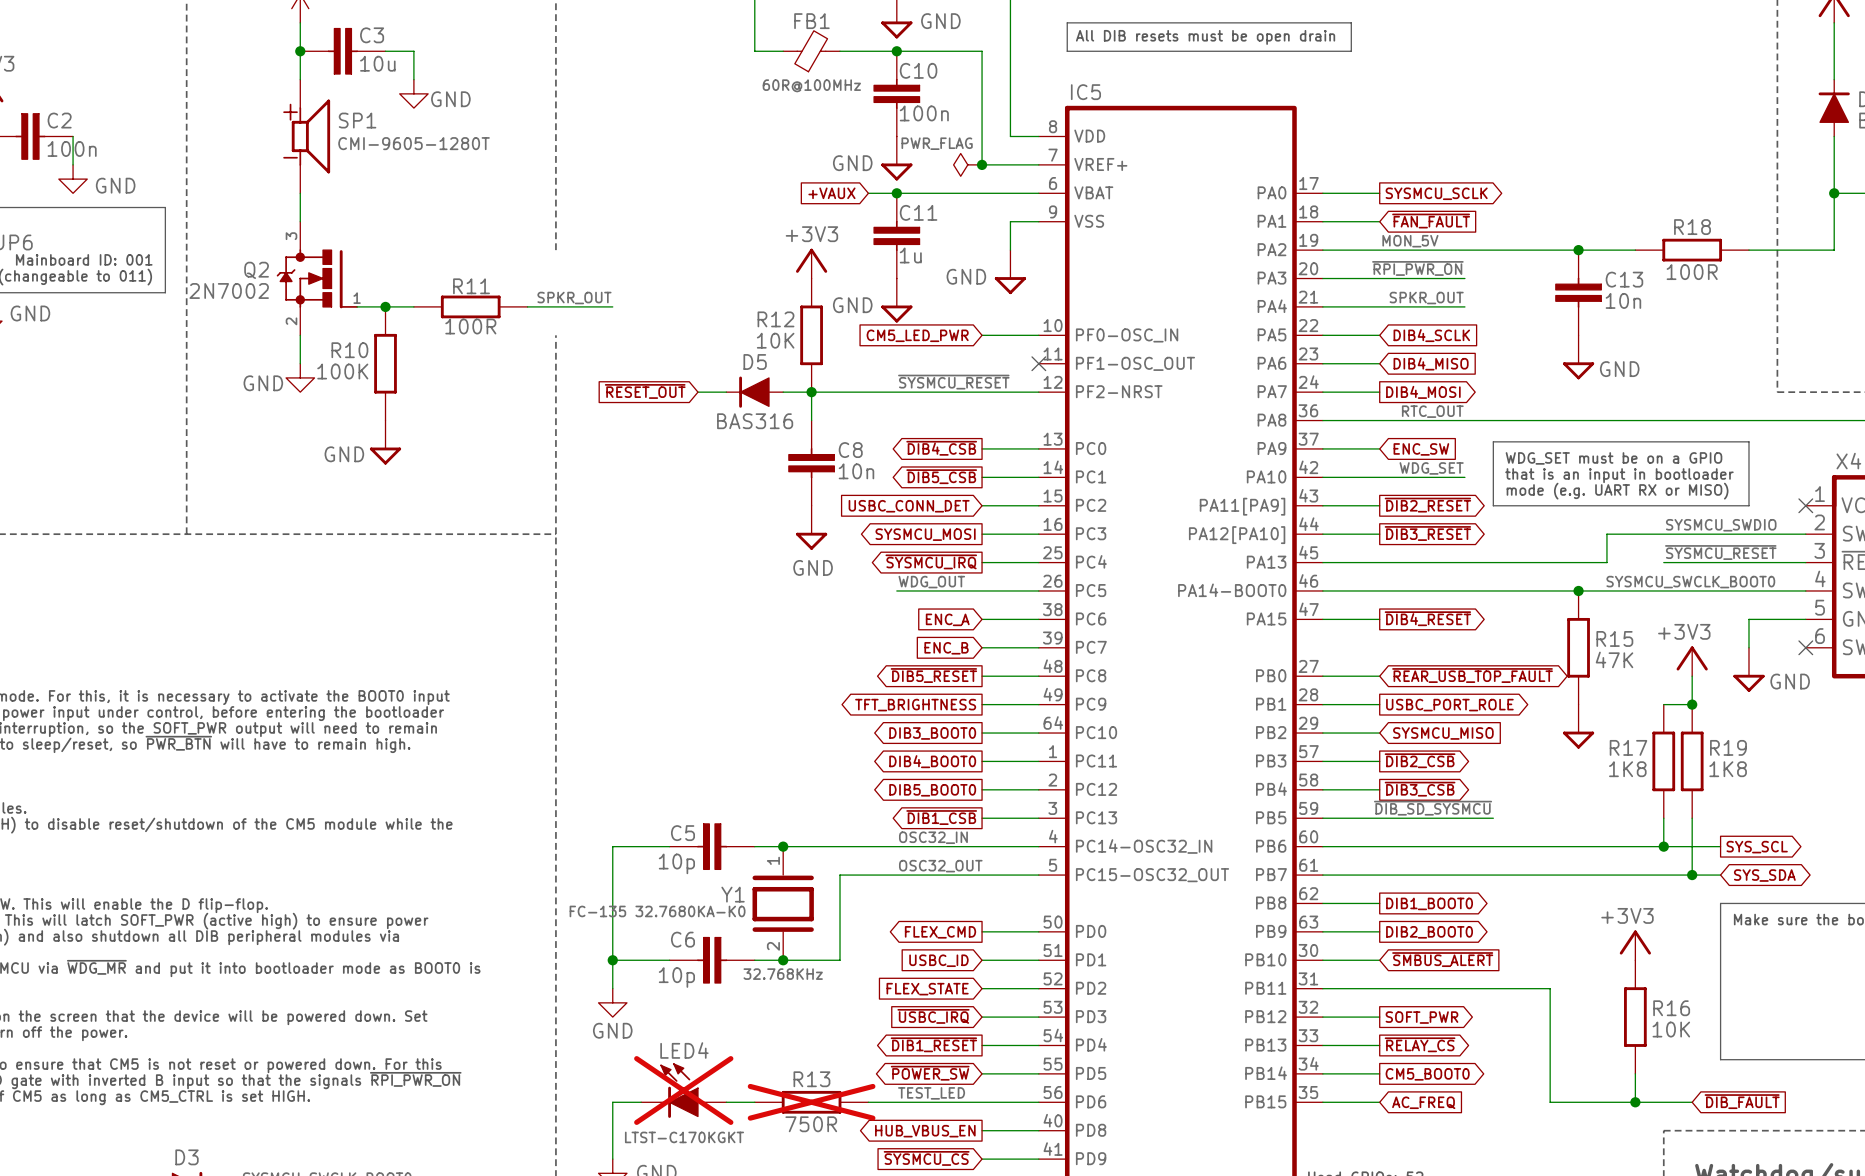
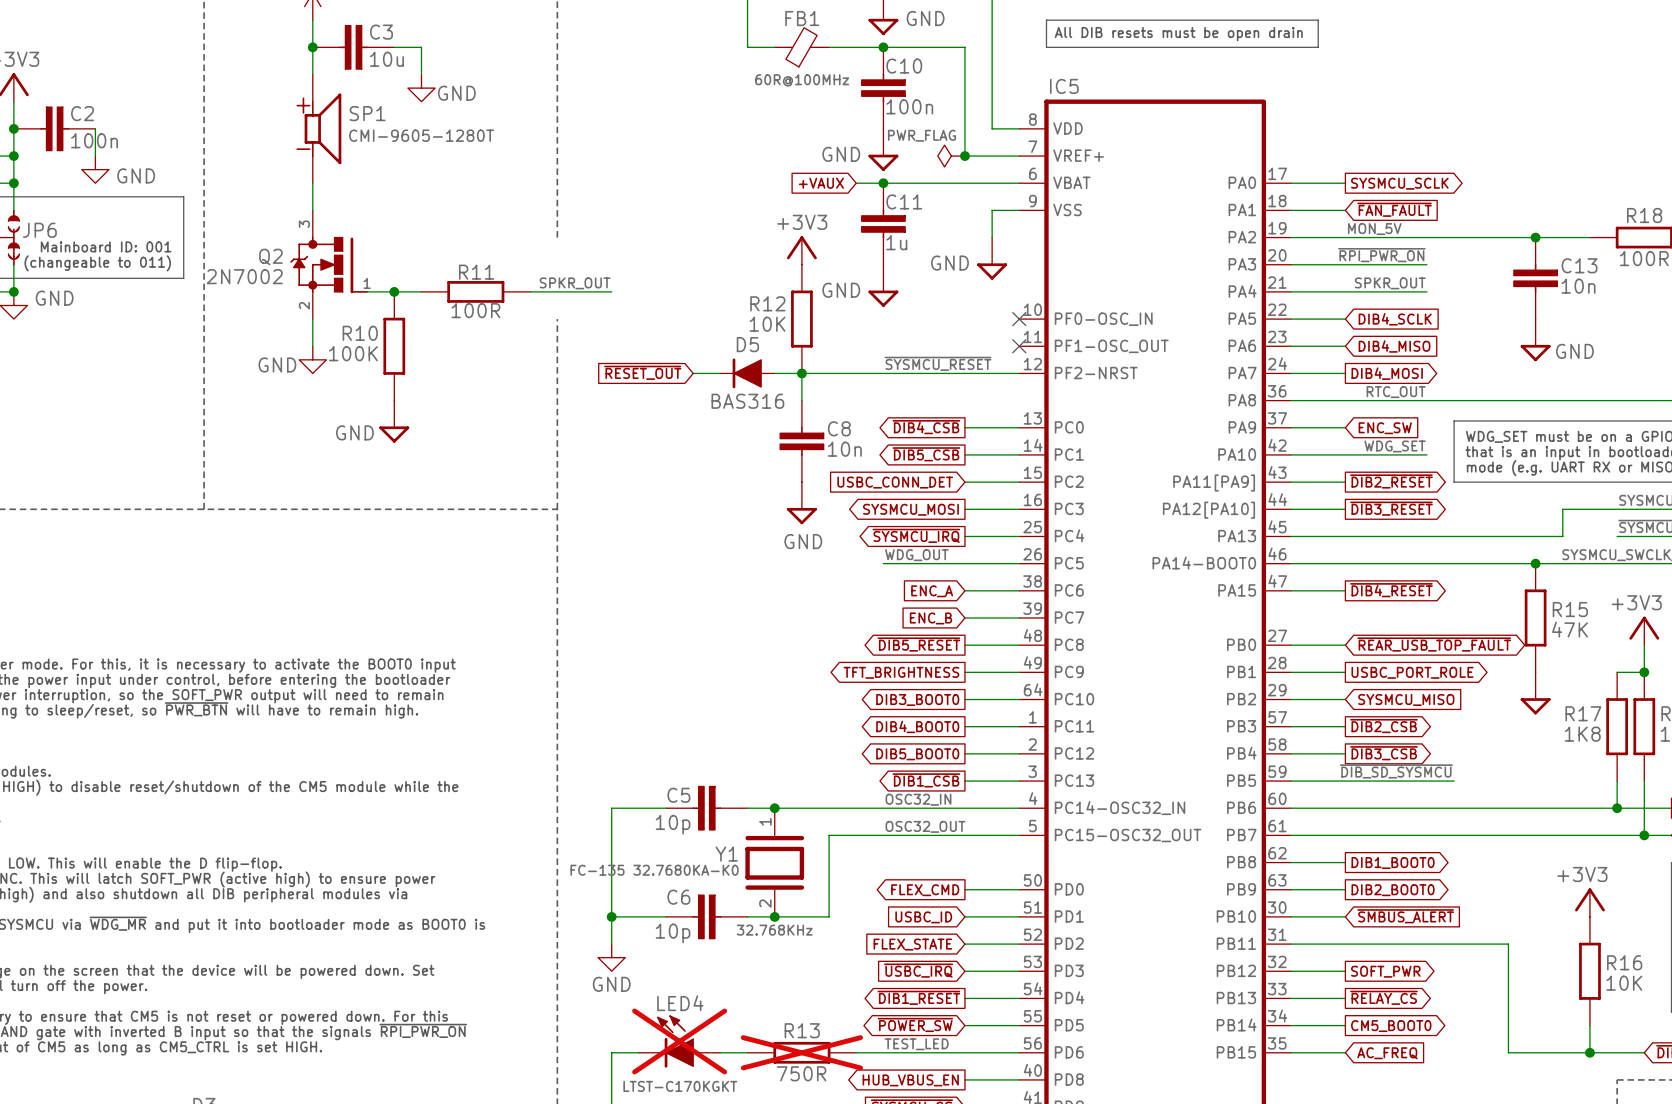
global label: CM5_LED_PWR (917, 335) -> none
wire: (982, 335) (1038, 335) -> none
no-connect mark: none -> (1019, 319)

